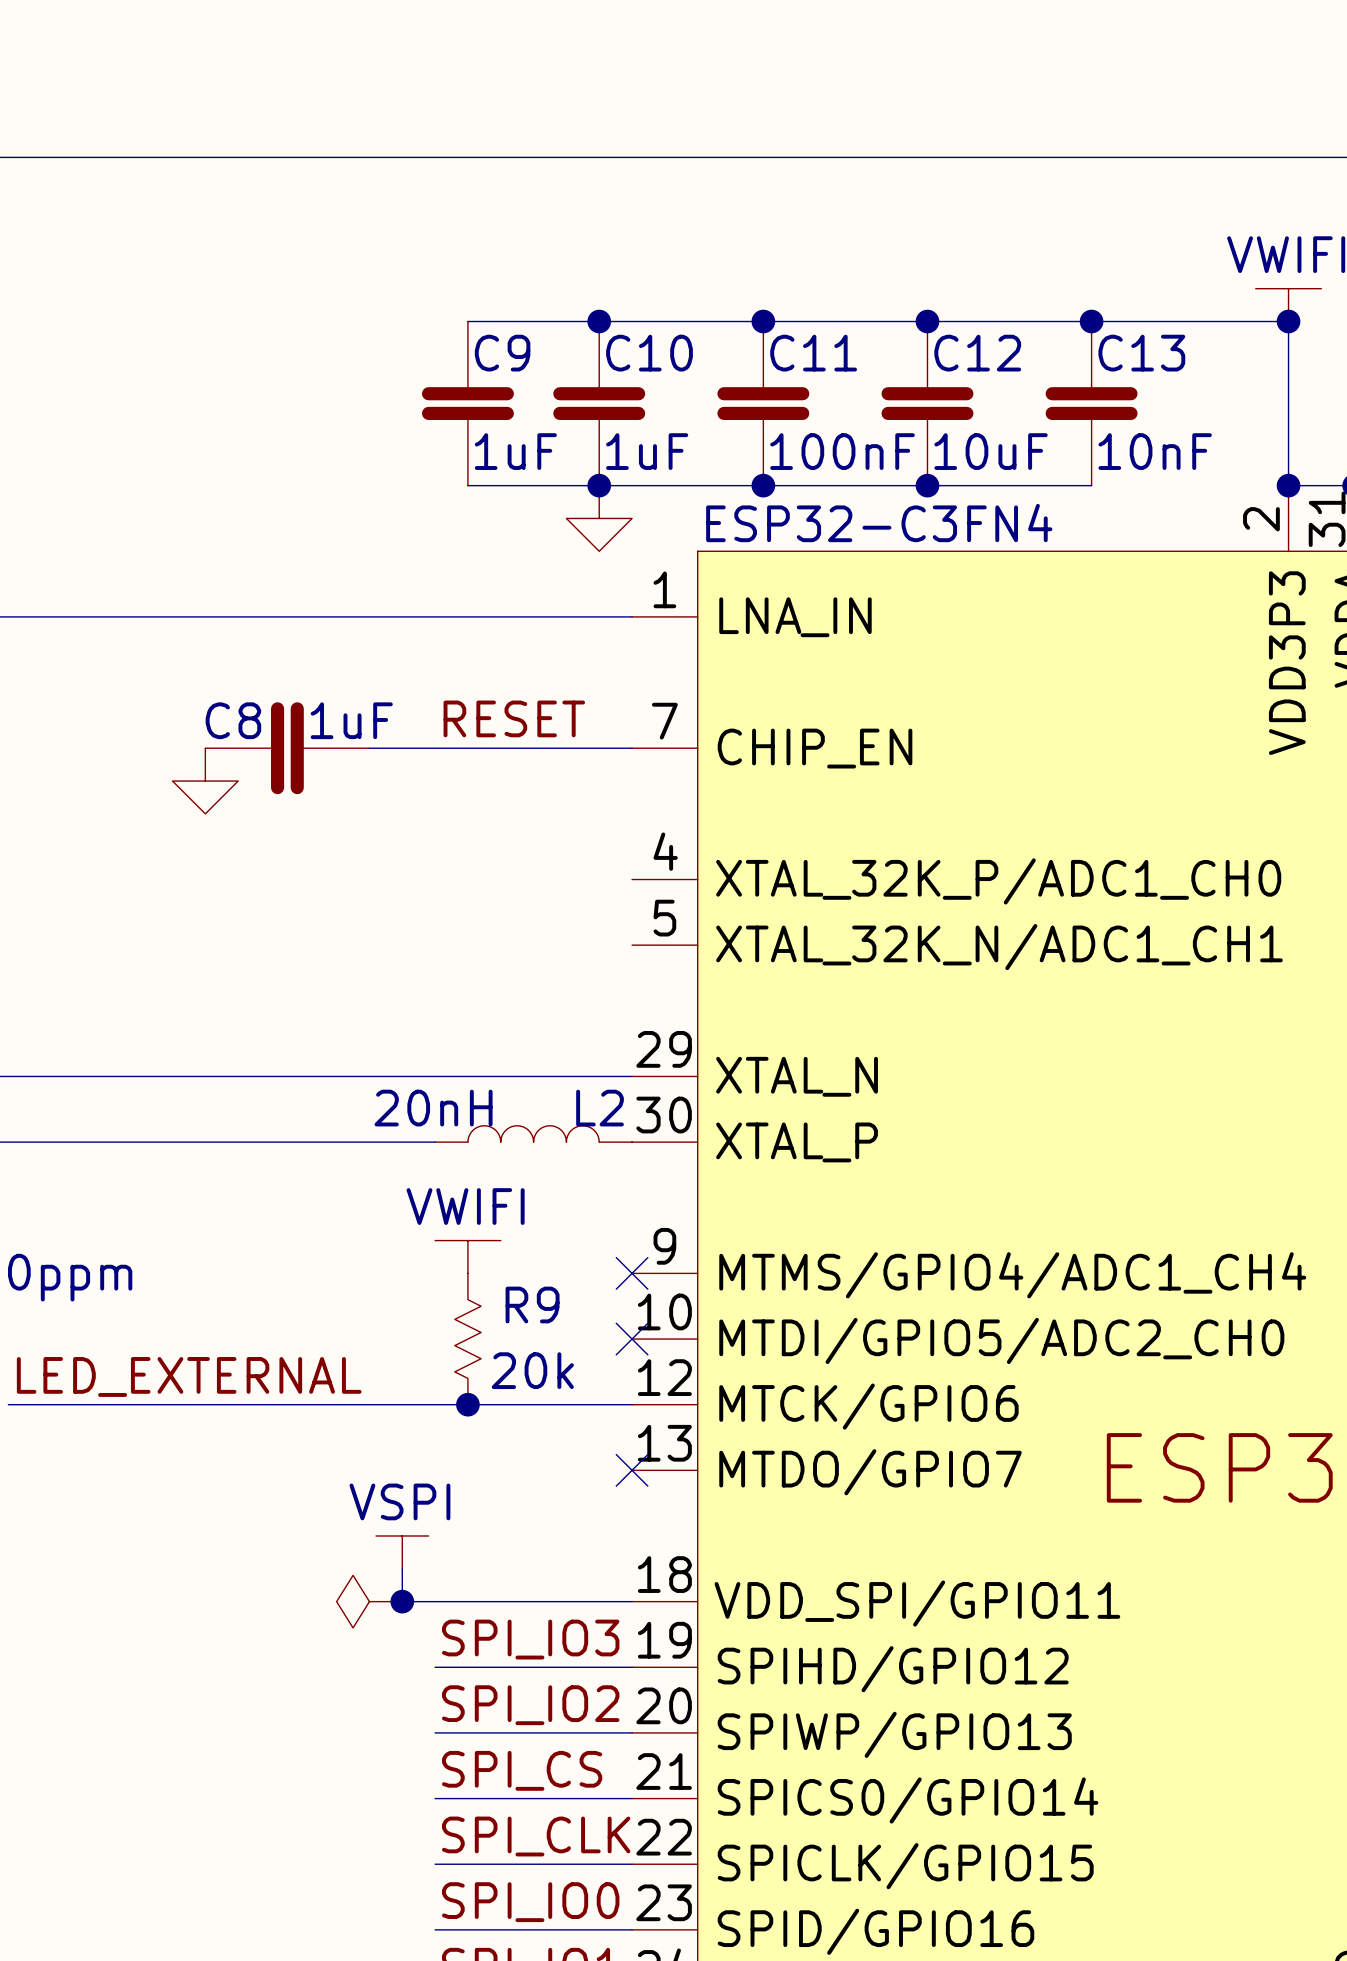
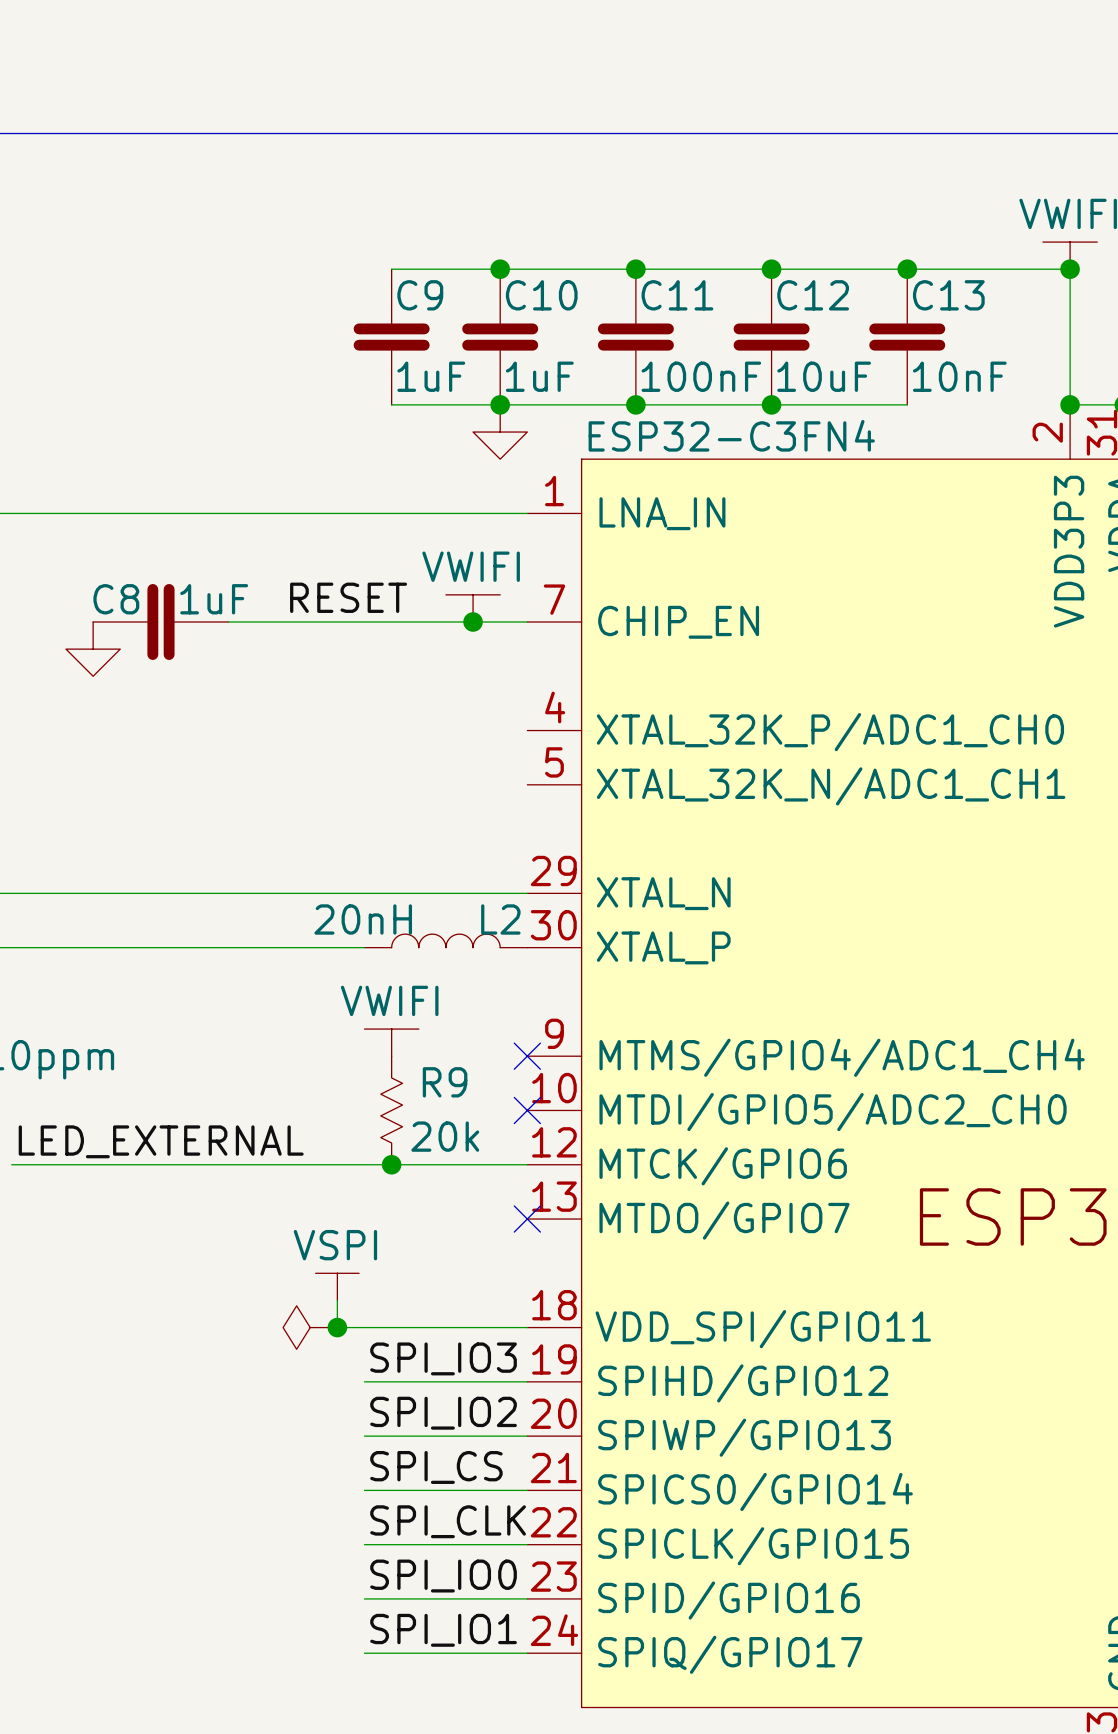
label position: RESET (514, 718) -> RESET (348, 597)
power symbol: none -> VWIFI (473, 608)
C8 position: (287, 748) -> (160, 621)
junction: none -> (473, 621)
power symbol position: (205, 781) -> (93, 649)

